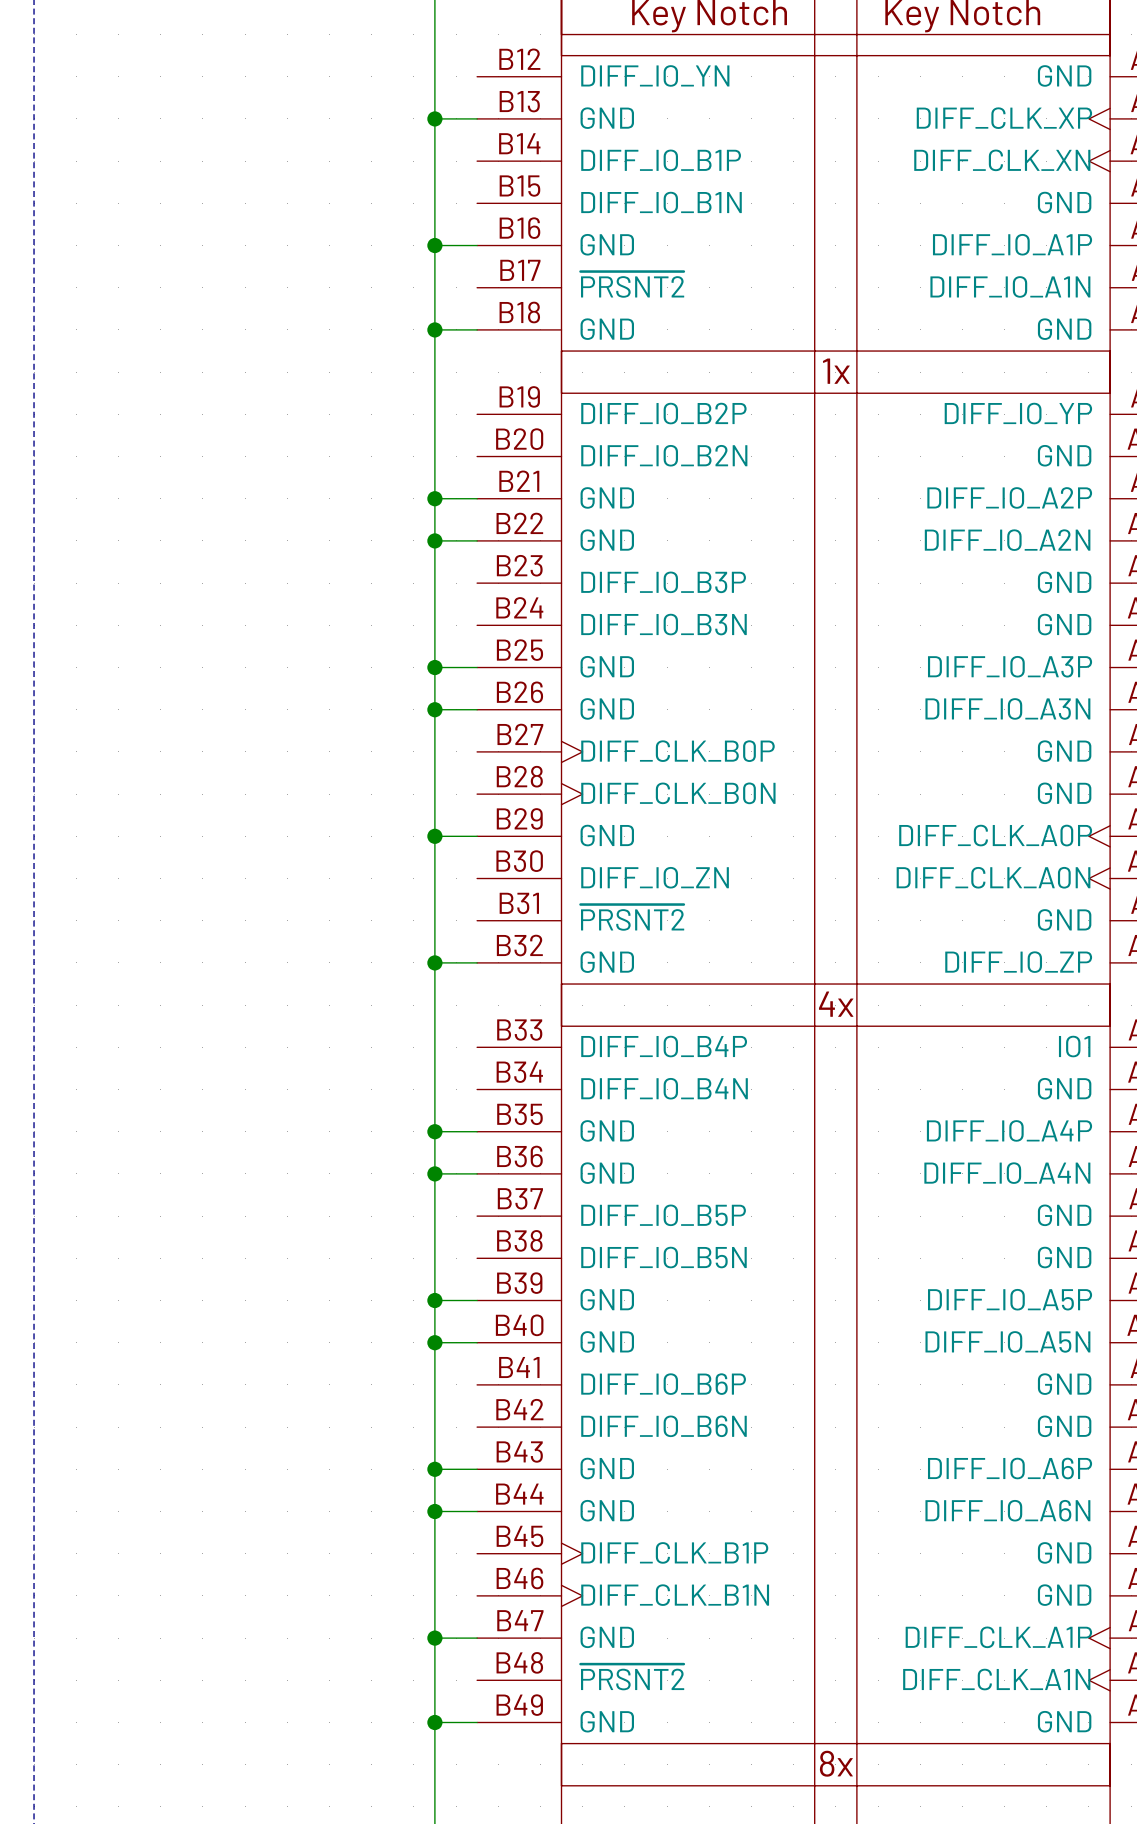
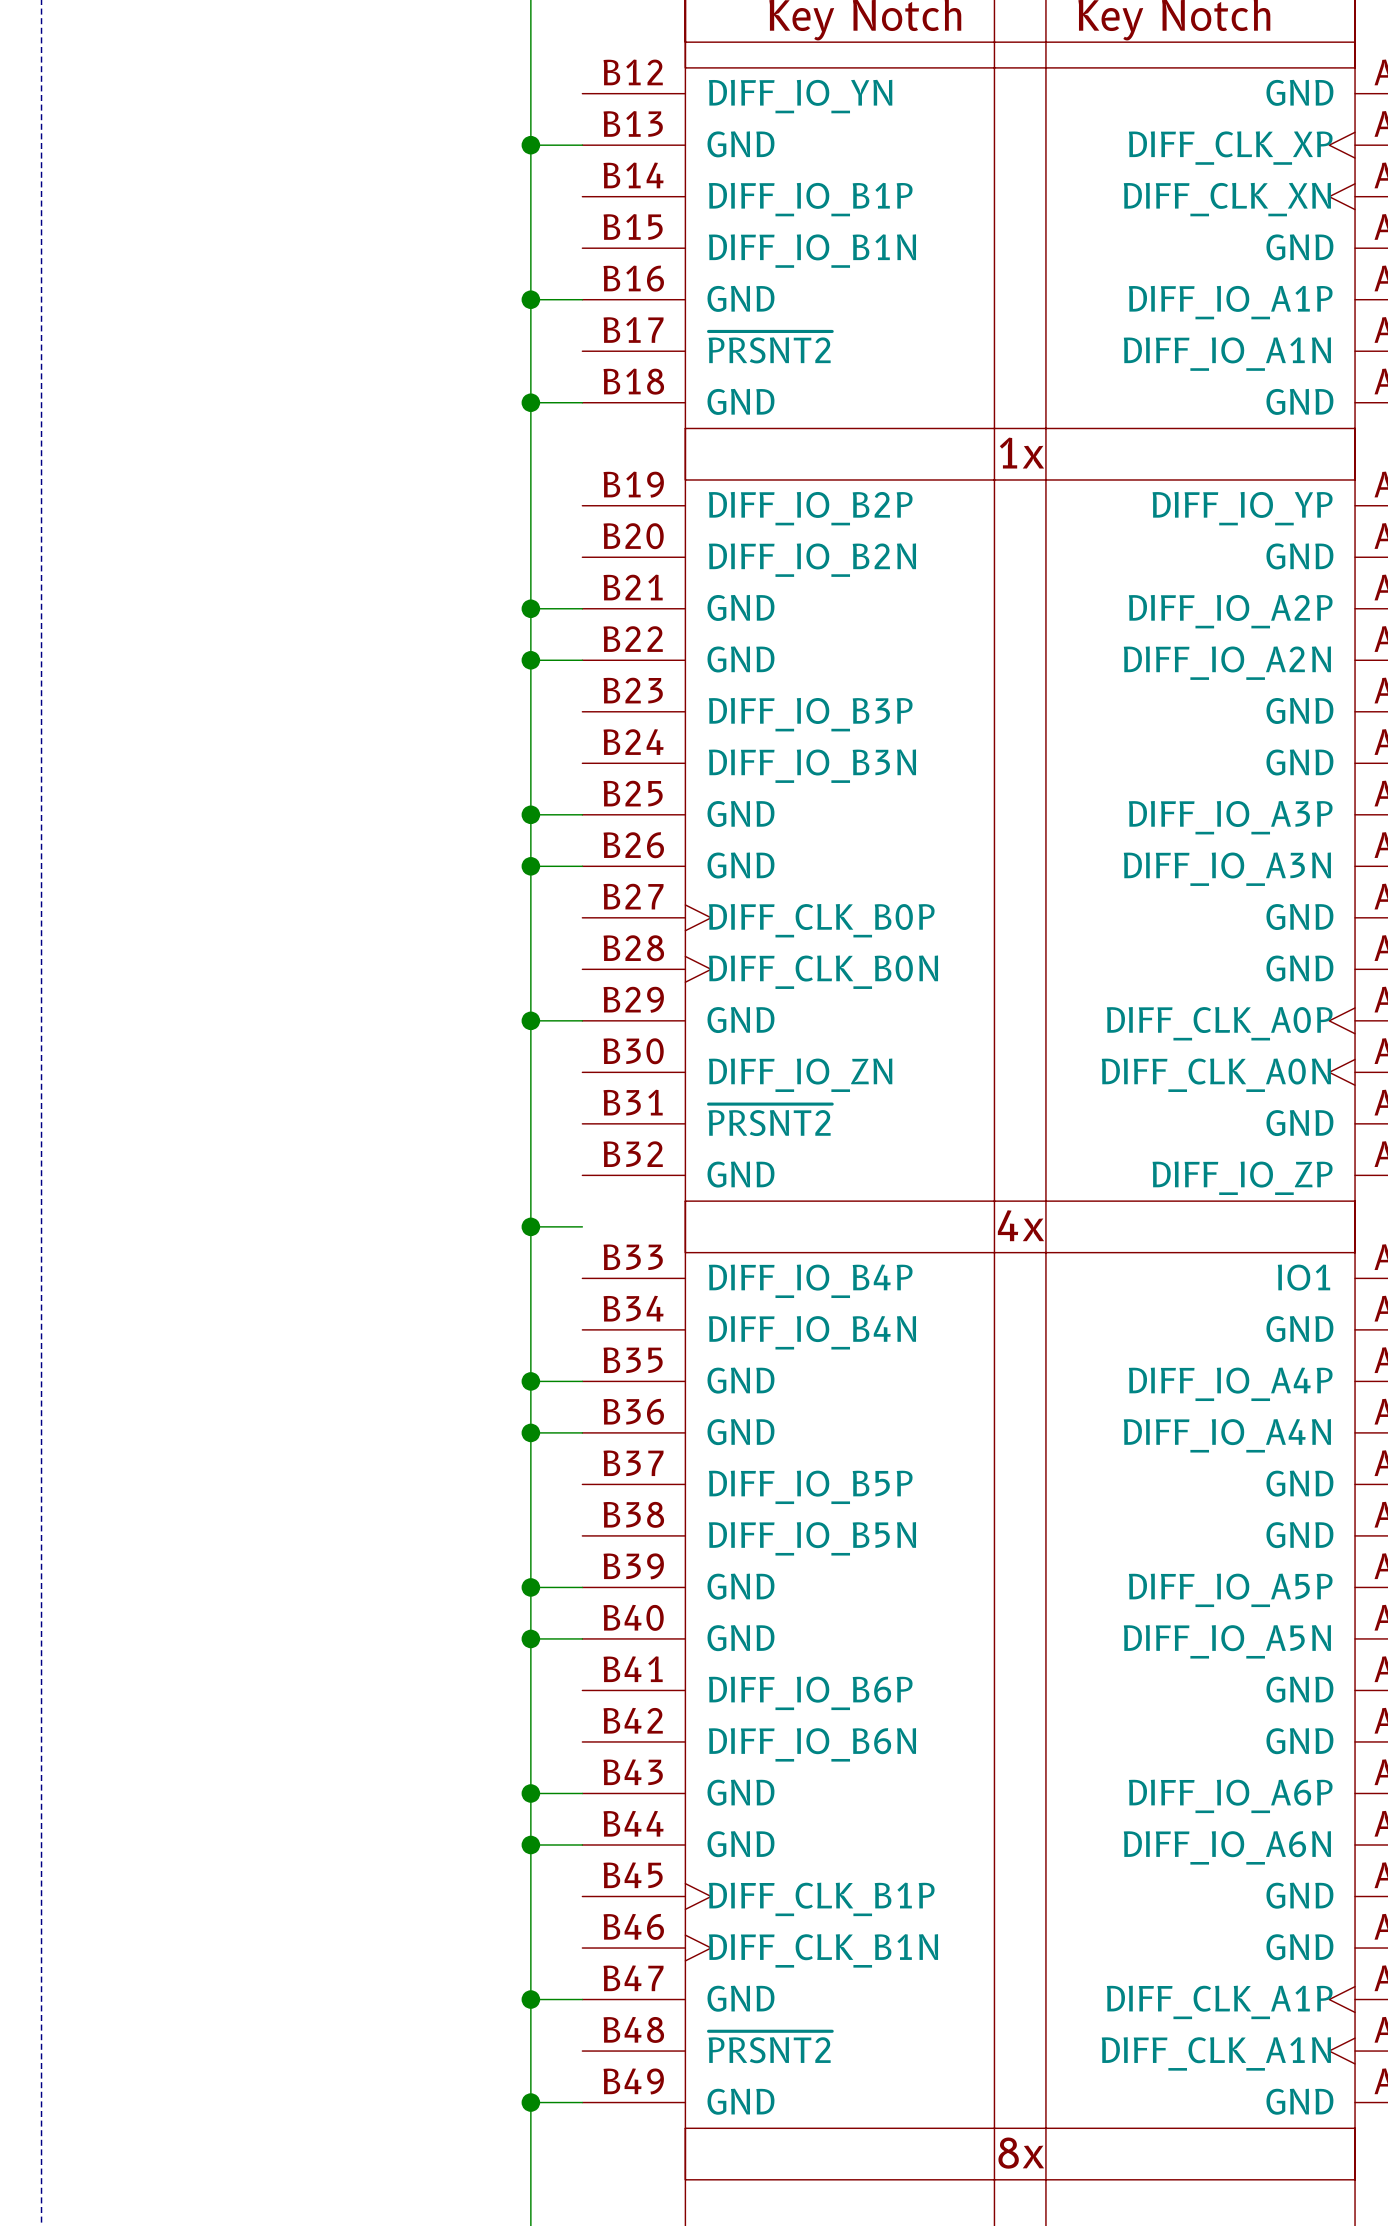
wire: (434, 962) (477, 962) -> (530, 1226) (582, 1226)
junction position: (434, 962) -> (530, 1226)

